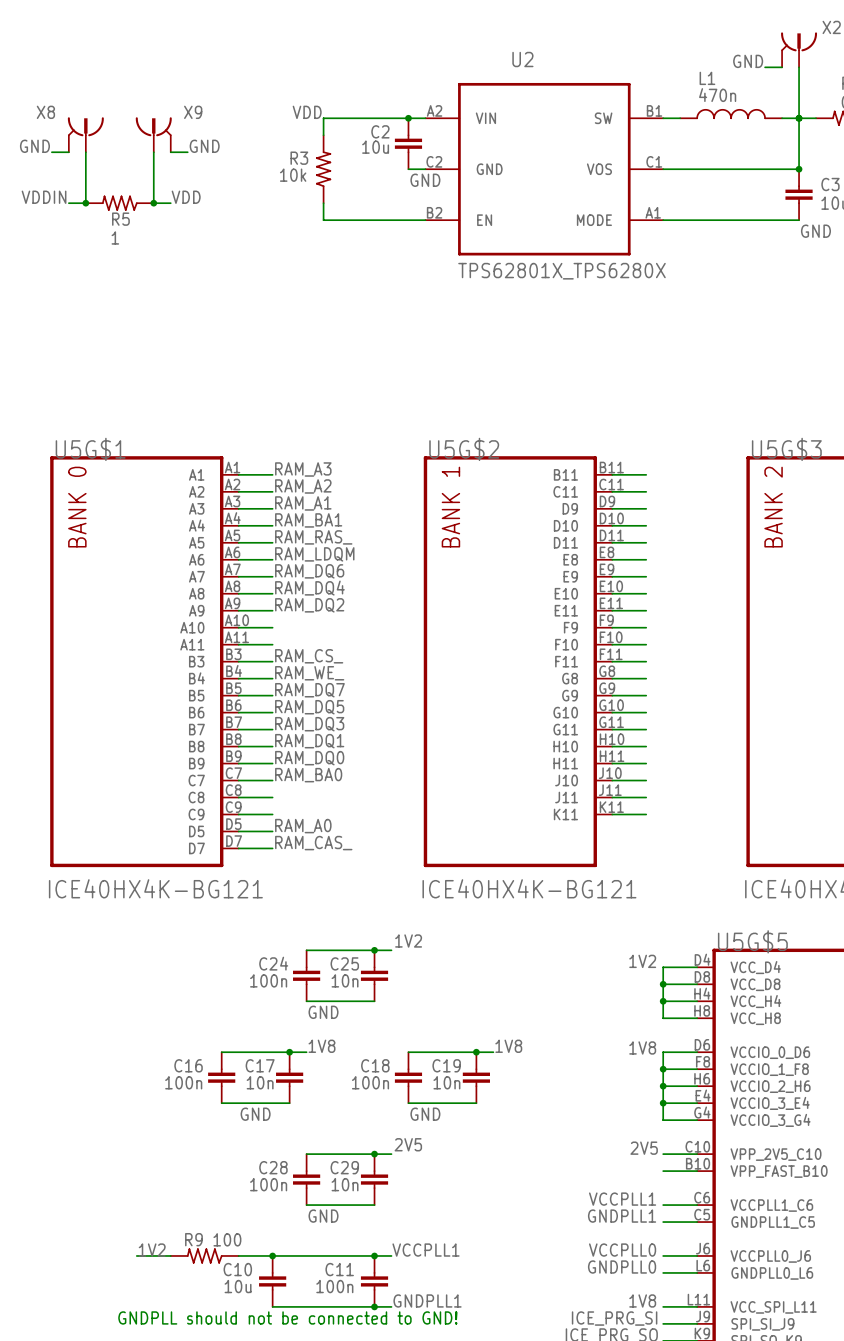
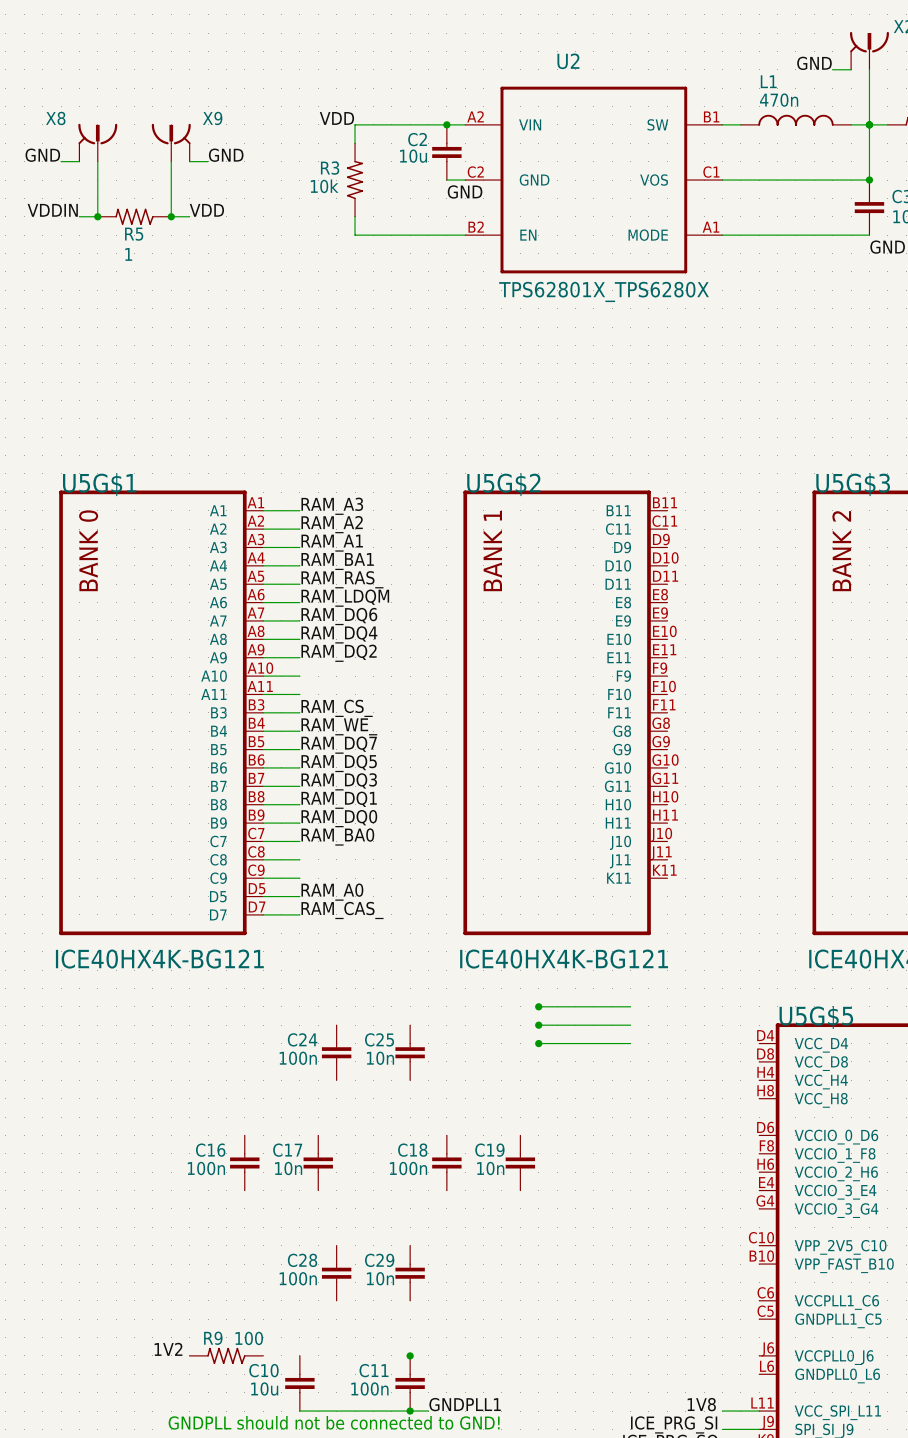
wire: (612, 474) (646, 474) -> none
wire: (612, 491) (646, 491) -> none
wire: (612, 508) (646, 508) -> none
wire: (612, 525) (646, 525) -> none
wire: (612, 542) (646, 542) -> none
wire: (612, 559) (646, 559) -> none
wire: (612, 576) (646, 576) -> none
wire: (612, 593) (646, 593) -> none
wire: (612, 610) (646, 610) -> none
wire: (612, 627) (646, 627) -> none
wire: (612, 644) (646, 644) -> none
wire: (612, 661) (646, 661) -> none
wire: (612, 678) (646, 678) -> none
wire: (612, 695) (646, 695) -> none
wire: (612, 712) (646, 712) -> none
wire: (612, 729) (646, 729) -> none
wire: (612, 746) (646, 746) -> none
wire: (612, 763) (646, 763) -> none
wire: (612, 780) (646, 780) -> none
wire: (612, 797) (646, 797) -> none
wire: (612, 814) (646, 814) -> none
wire: none -> (538, 1006) (630, 1006)
junction: none -> (538, 1006)
label: 1V2 (408, 940) -> none
wire: (306, 950) (391, 950) -> none
junction: (374, 950) -> none
wire: none -> (538, 1025) (630, 1025)
junction: none -> (538, 1025)
label: 1V2 (642, 961) -> none
junction: none -> (538, 1043)
wire: (697, 967) (663, 967) (663, 1018) (697, 1018) -> none
wire: (663, 984) (697, 984) -> none
junction: (663, 984) -> none
wire: (306, 1001) (374, 1001) -> none
wire: (663, 1001) (697, 1001) -> none
junction: (663, 1001) -> none
label: GND (323, 1012) -> none
label: 1V8 (321, 1046) -> none
label: 1V8 (508, 1046) -> none
label: 1V8 (642, 1047) -> none
wire: (221, 1052) (306, 1052) -> none
junction: (289, 1052) -> none
wire: (408, 1052) (493, 1052) -> (538, 1043) (630, 1043)
junction: (476, 1052) -> none
wire: (697, 1052) (663, 1052) (663, 1120) (697, 1120) -> none
wire: (663, 1069) (697, 1069) -> none
junction: (663, 1069) -> none
wire: (663, 1086) (697, 1086) -> none
junction: (663, 1086) -> none
wire: (221, 1103) (289, 1103) -> none
wire: (408, 1103) (476, 1103) -> none
wire: (663, 1103) (697, 1103) -> none
junction: (663, 1103) -> none
label: GND (255, 1114) -> none
label: GND (425, 1114) -> none
label: 2V5 (408, 1144) -> none
label: 2V5 (644, 1148) -> none
wire: (306, 1154) (391, 1154) -> none
junction: (374, 1154) -> none
wire: (663, 1154) (697, 1154) -> none
wire: (663, 1171) (697, 1171) -> none
label: VCCPLL1 (622, 1199) -> none
wire: (306, 1205) (374, 1205) -> none
wire: (663, 1205) (697, 1205) -> none
label: GND (323, 1216) -> none
label: GNDPLL1 (622, 1216) -> none
wire: (663, 1222) (697, 1222) -> none
label: VCCPLL1 (426, 1250) -> none
label: VCCPLL0 (622, 1250) -> none
wire: (136, 1255) (170, 1255) -> none
wire: (238, 1255) (391, 1255) -> none
junction: (272, 1255) -> none
wire: (663, 1255) (697, 1255) -> none
label: GNDPLL0 (622, 1267) -> none
wire: (663, 1272) (697, 1272) -> none

